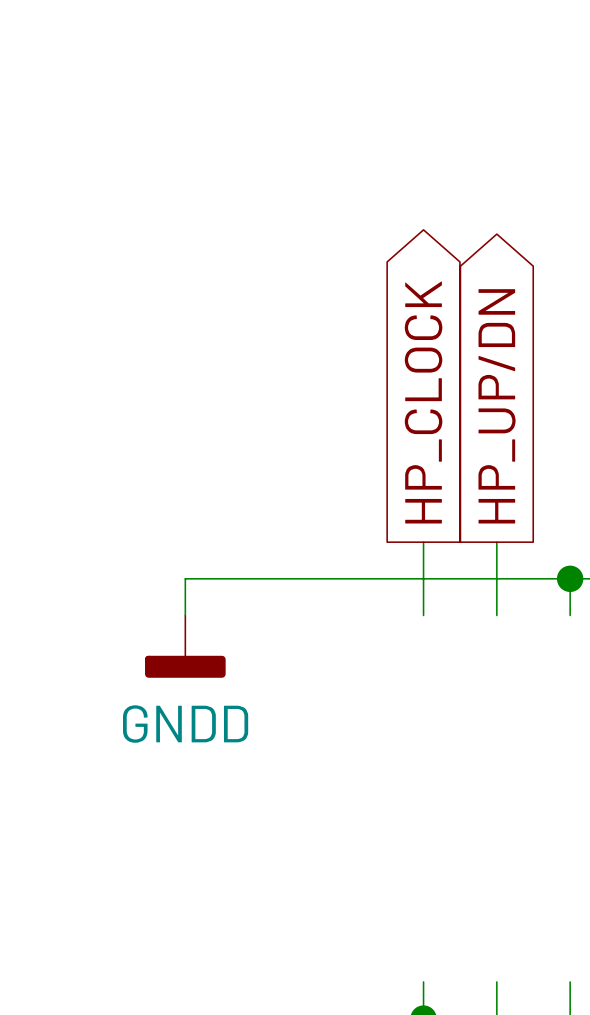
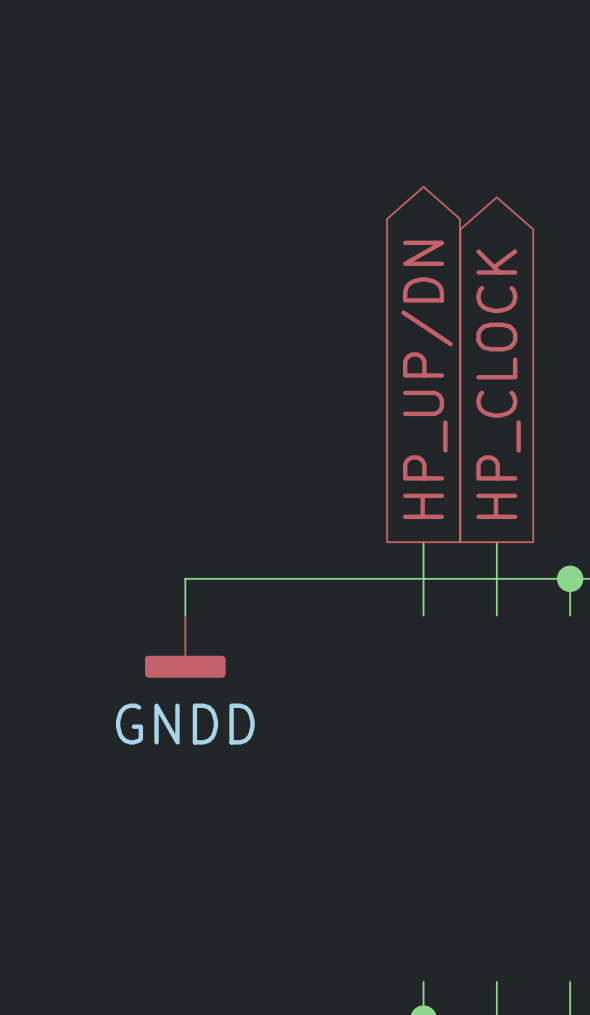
global label: HP_CLOCK (423, 402) -> HP_UP/DN (427, 379)
global label: HP_UP/DN (497, 406) -> HP_CLOCK (498, 384)

